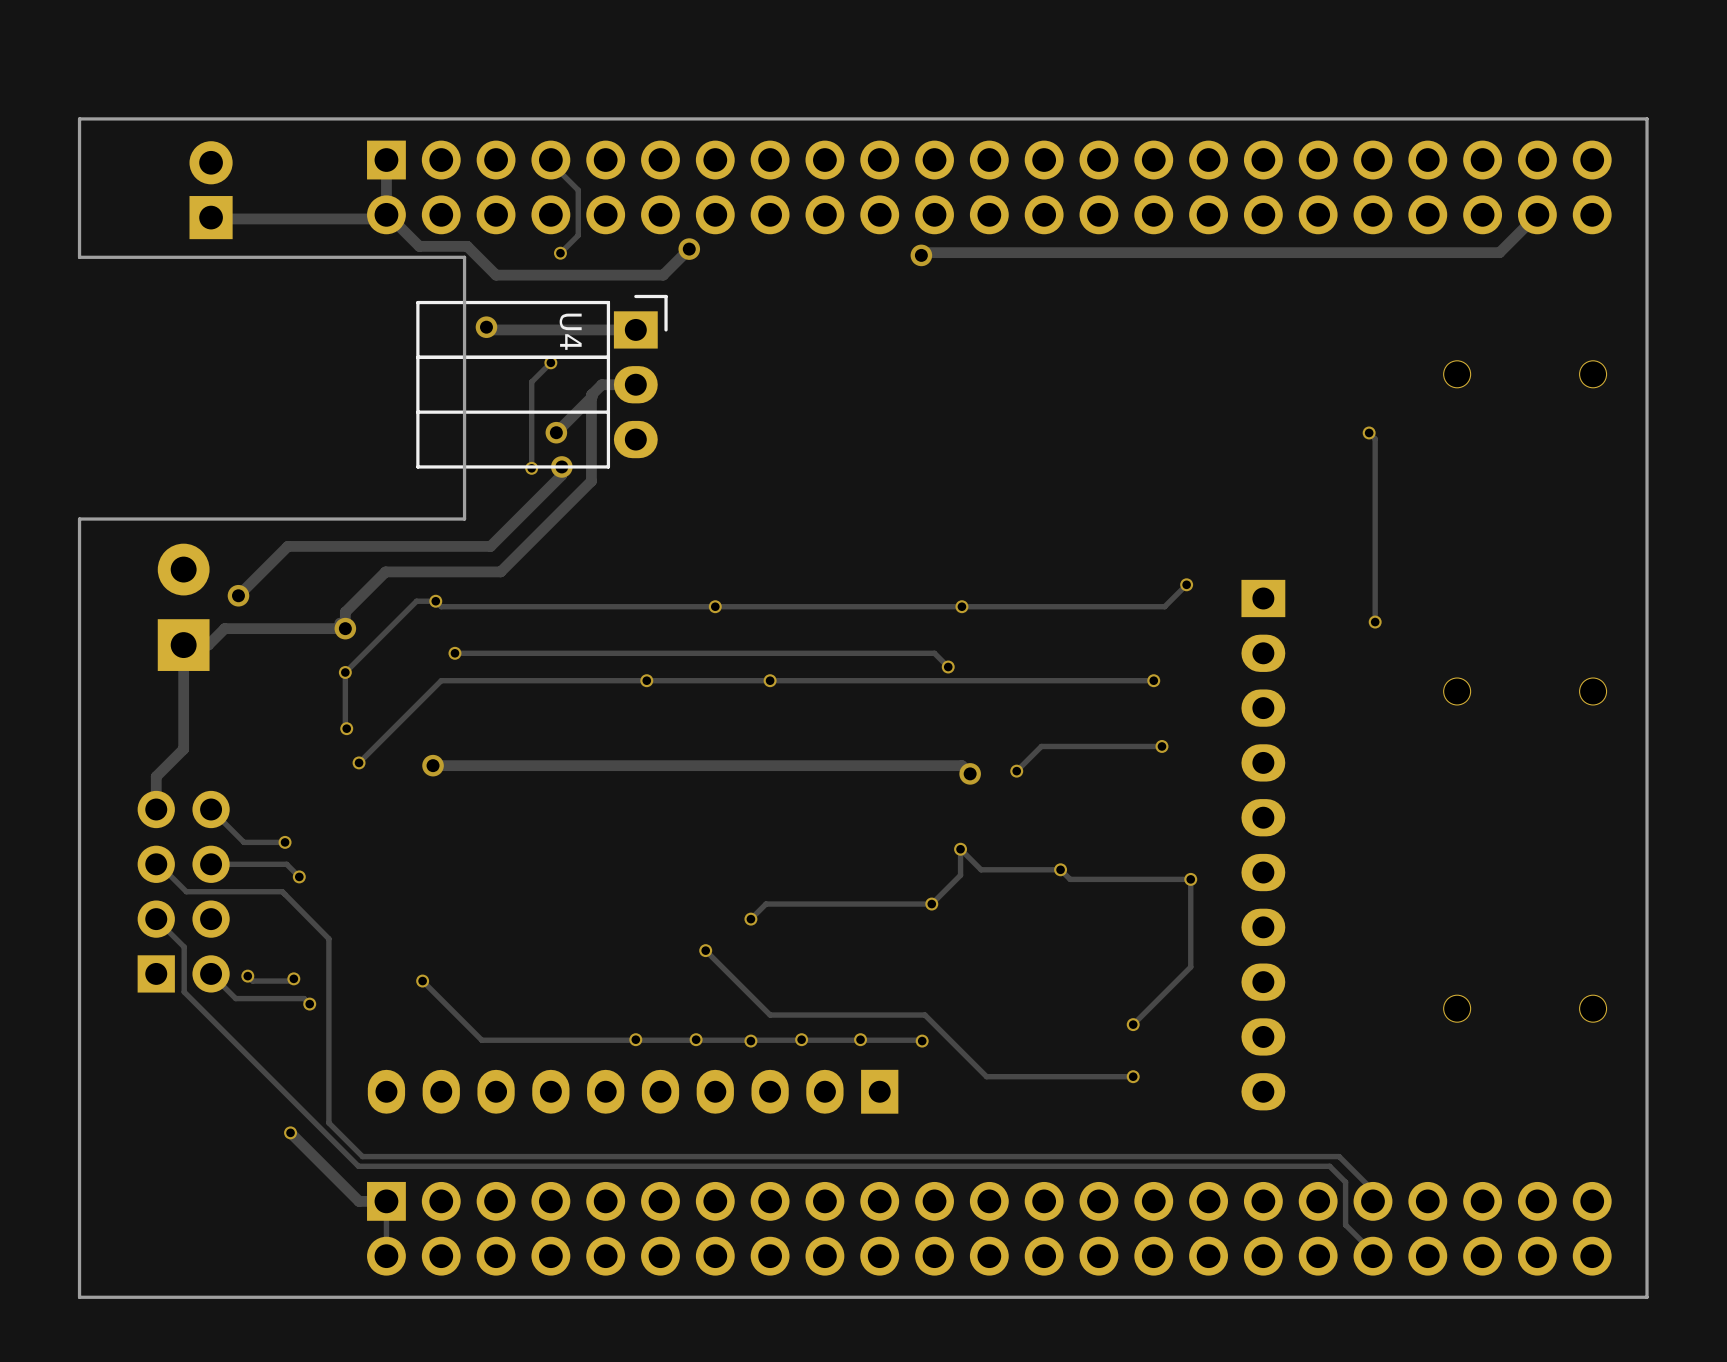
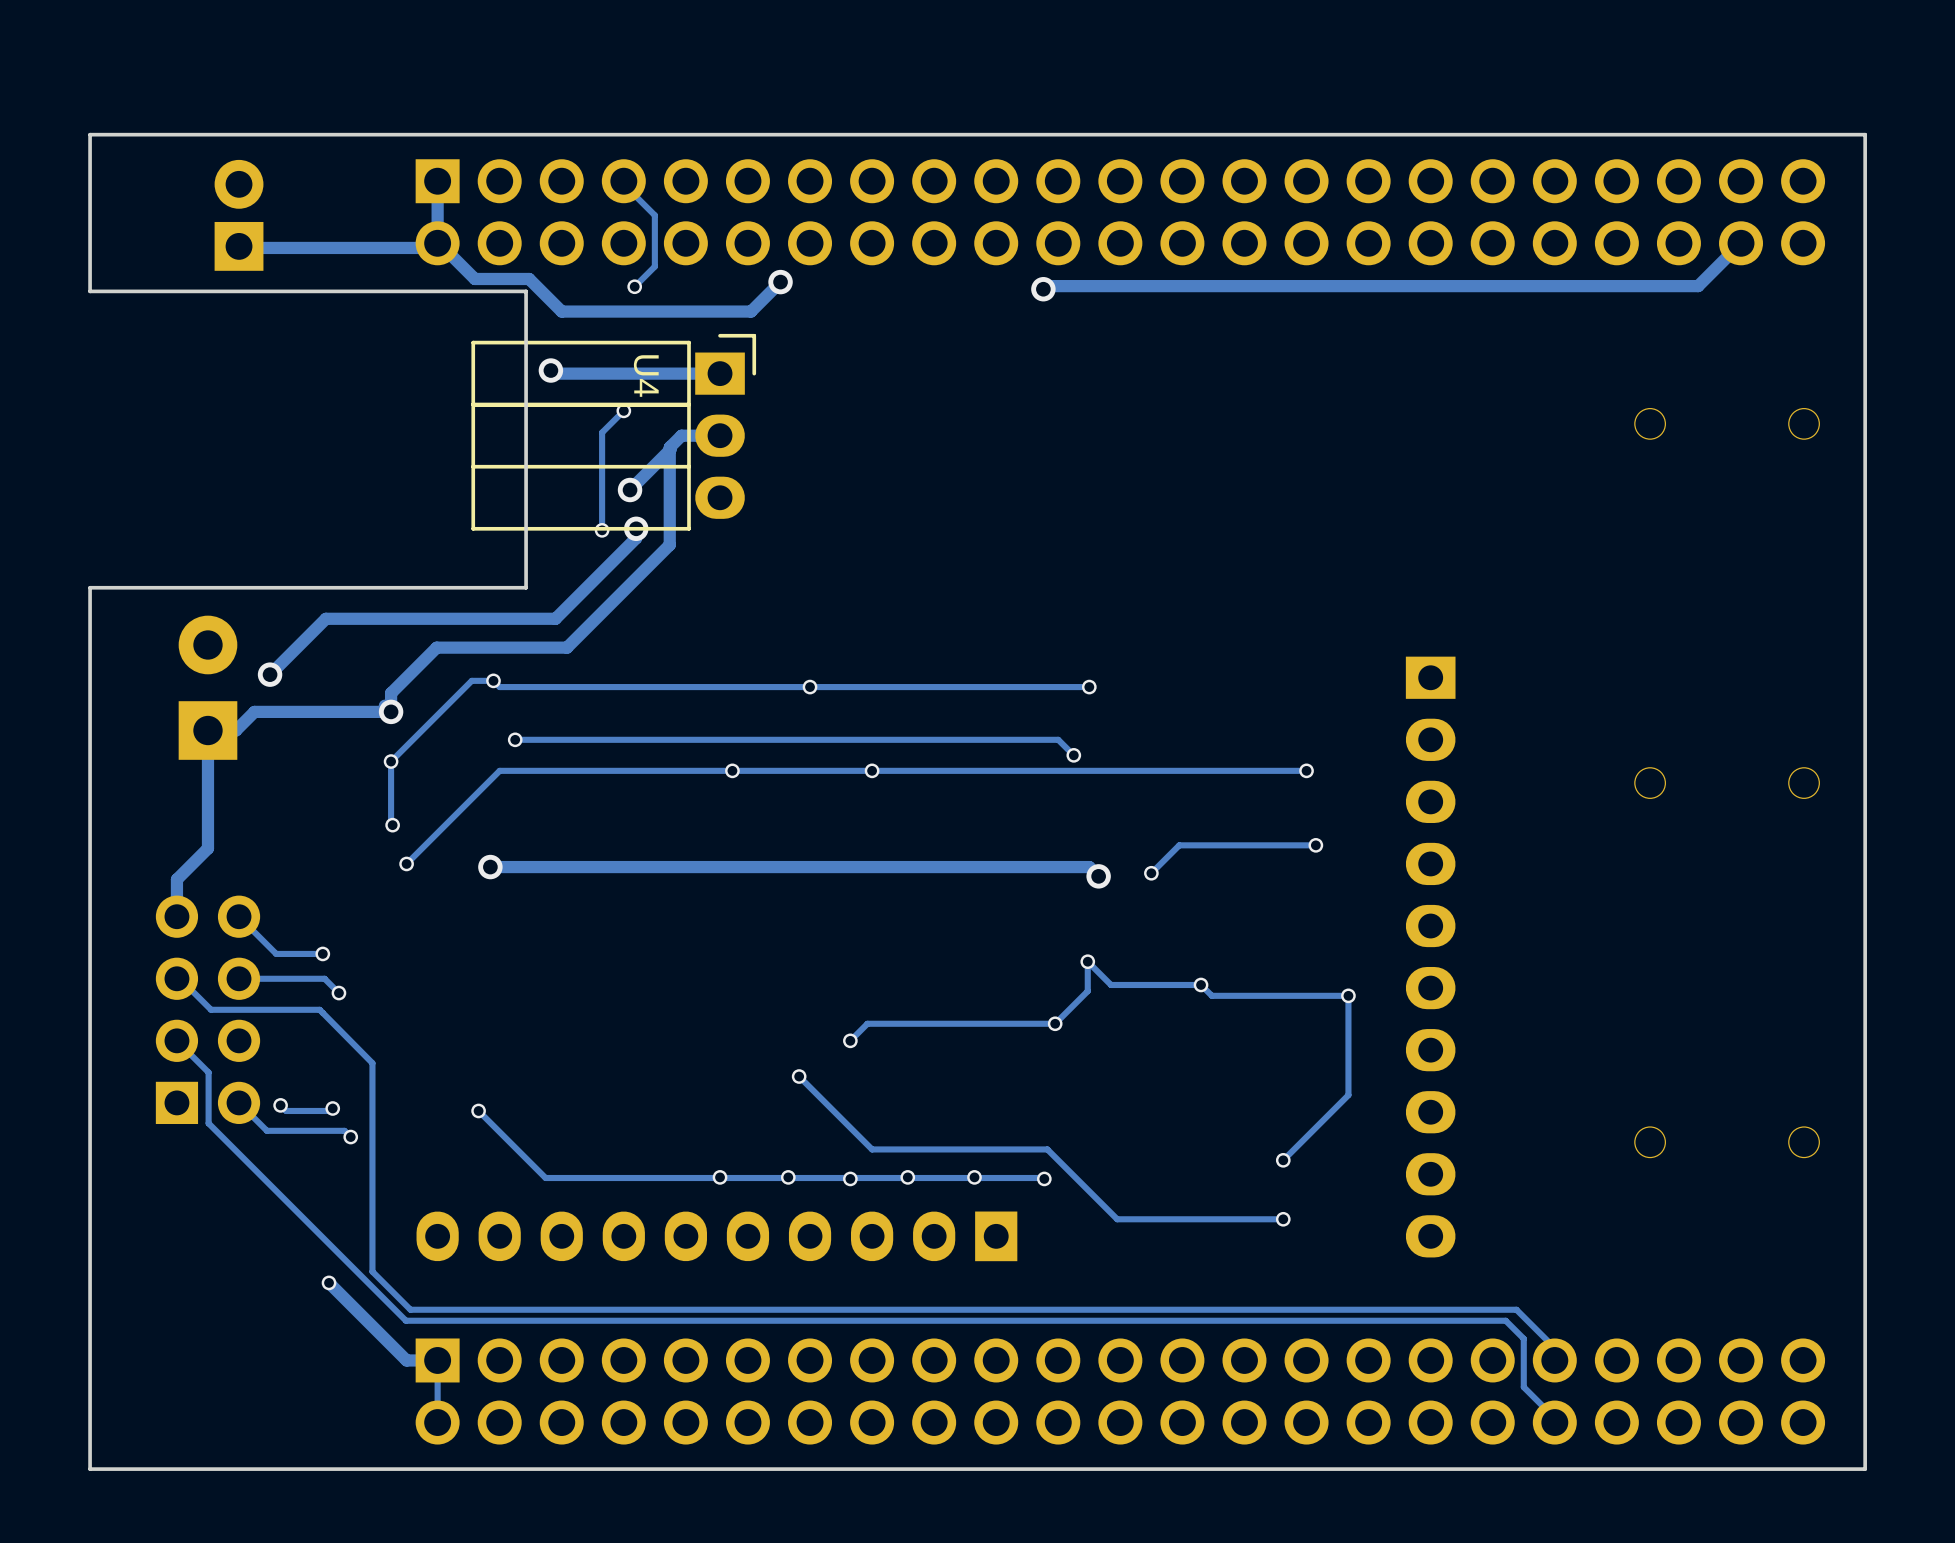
track: (1369, 432) (1375, 439) (1375, 622) -> none
via: (1369, 432) -> none
track: (1186, 584) (1164, 606) (961, 606) -> none
via: (1186, 584) -> none
via: (1375, 622) -> none

